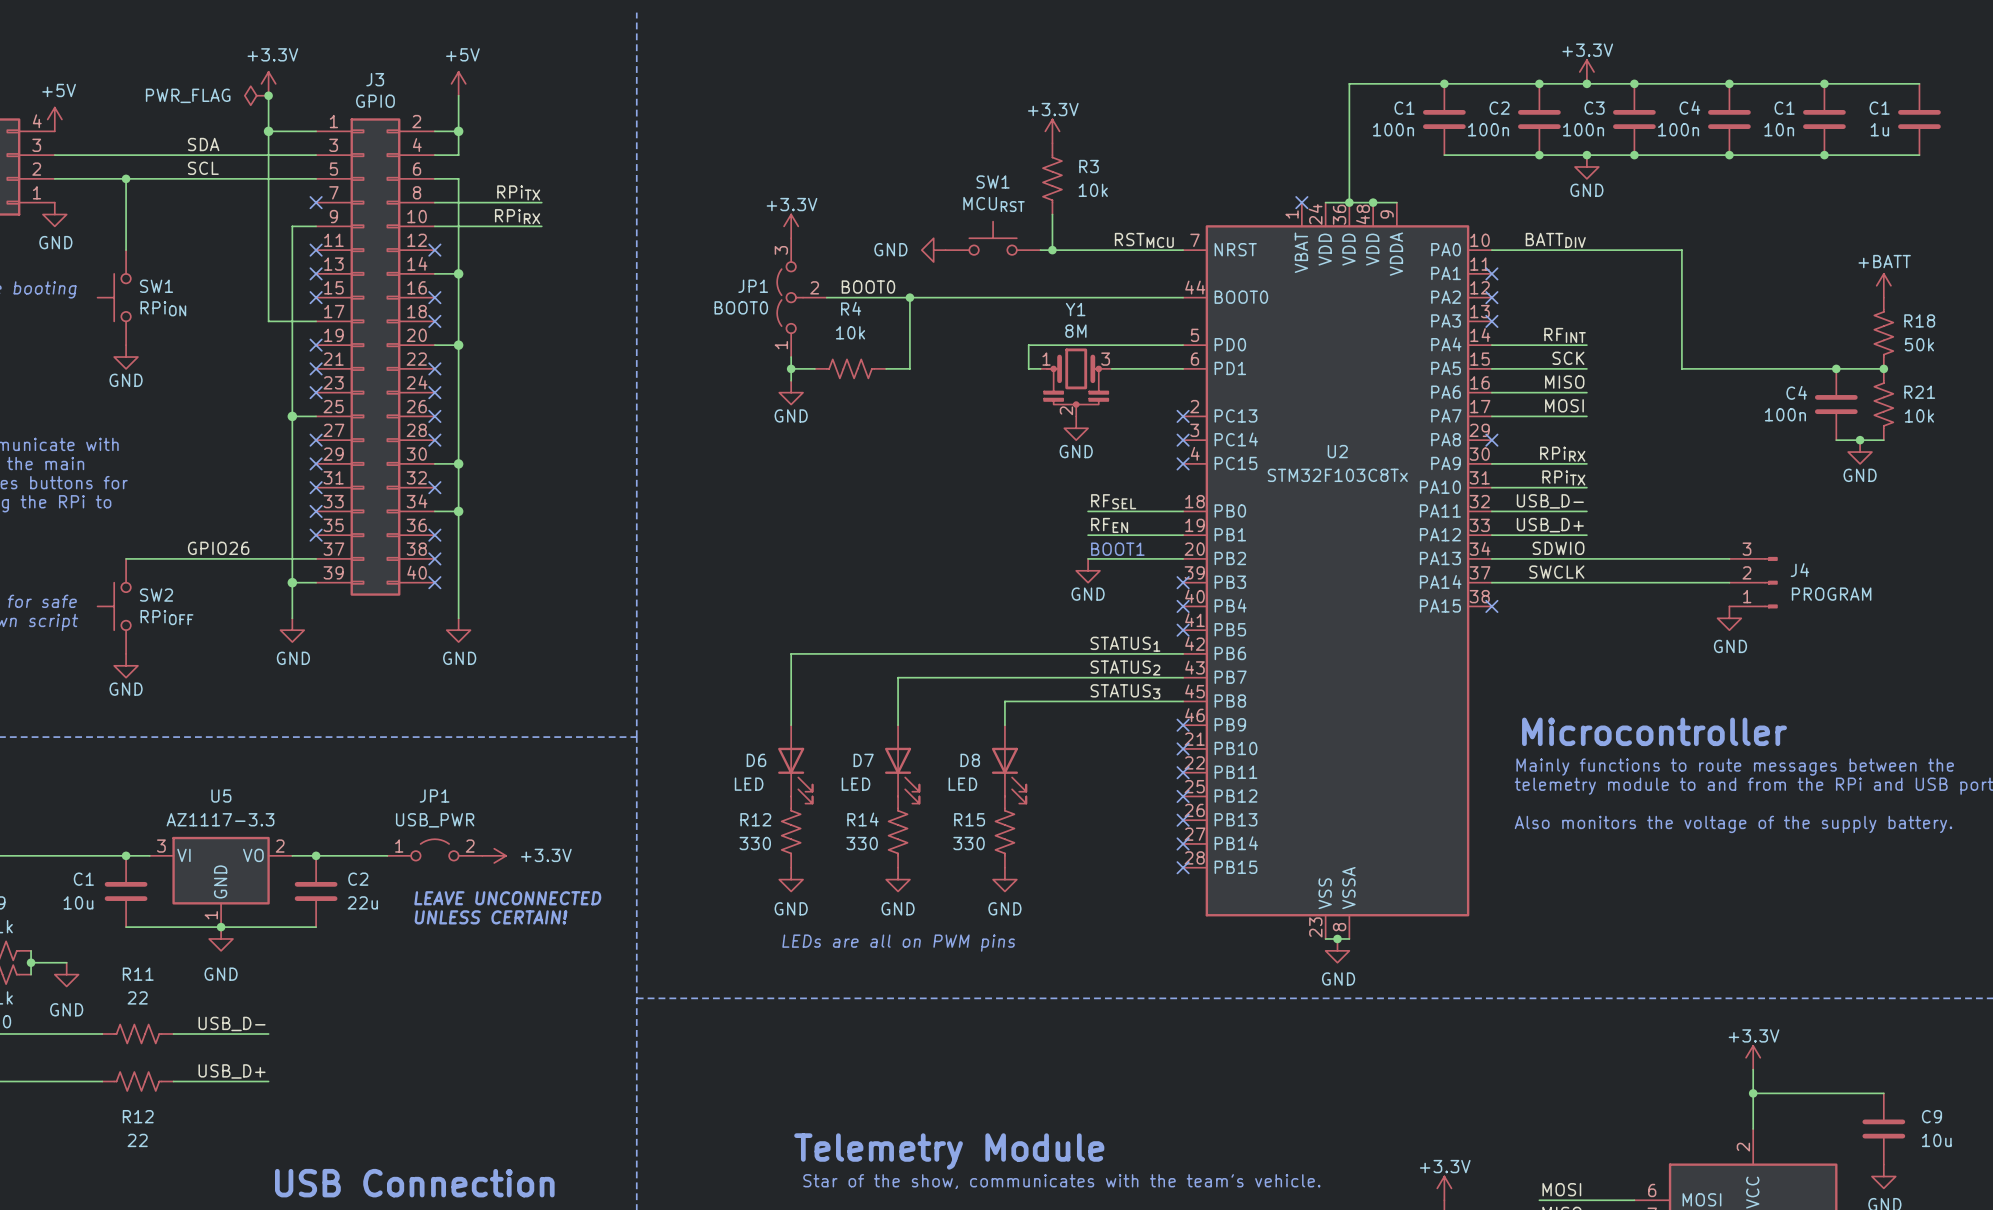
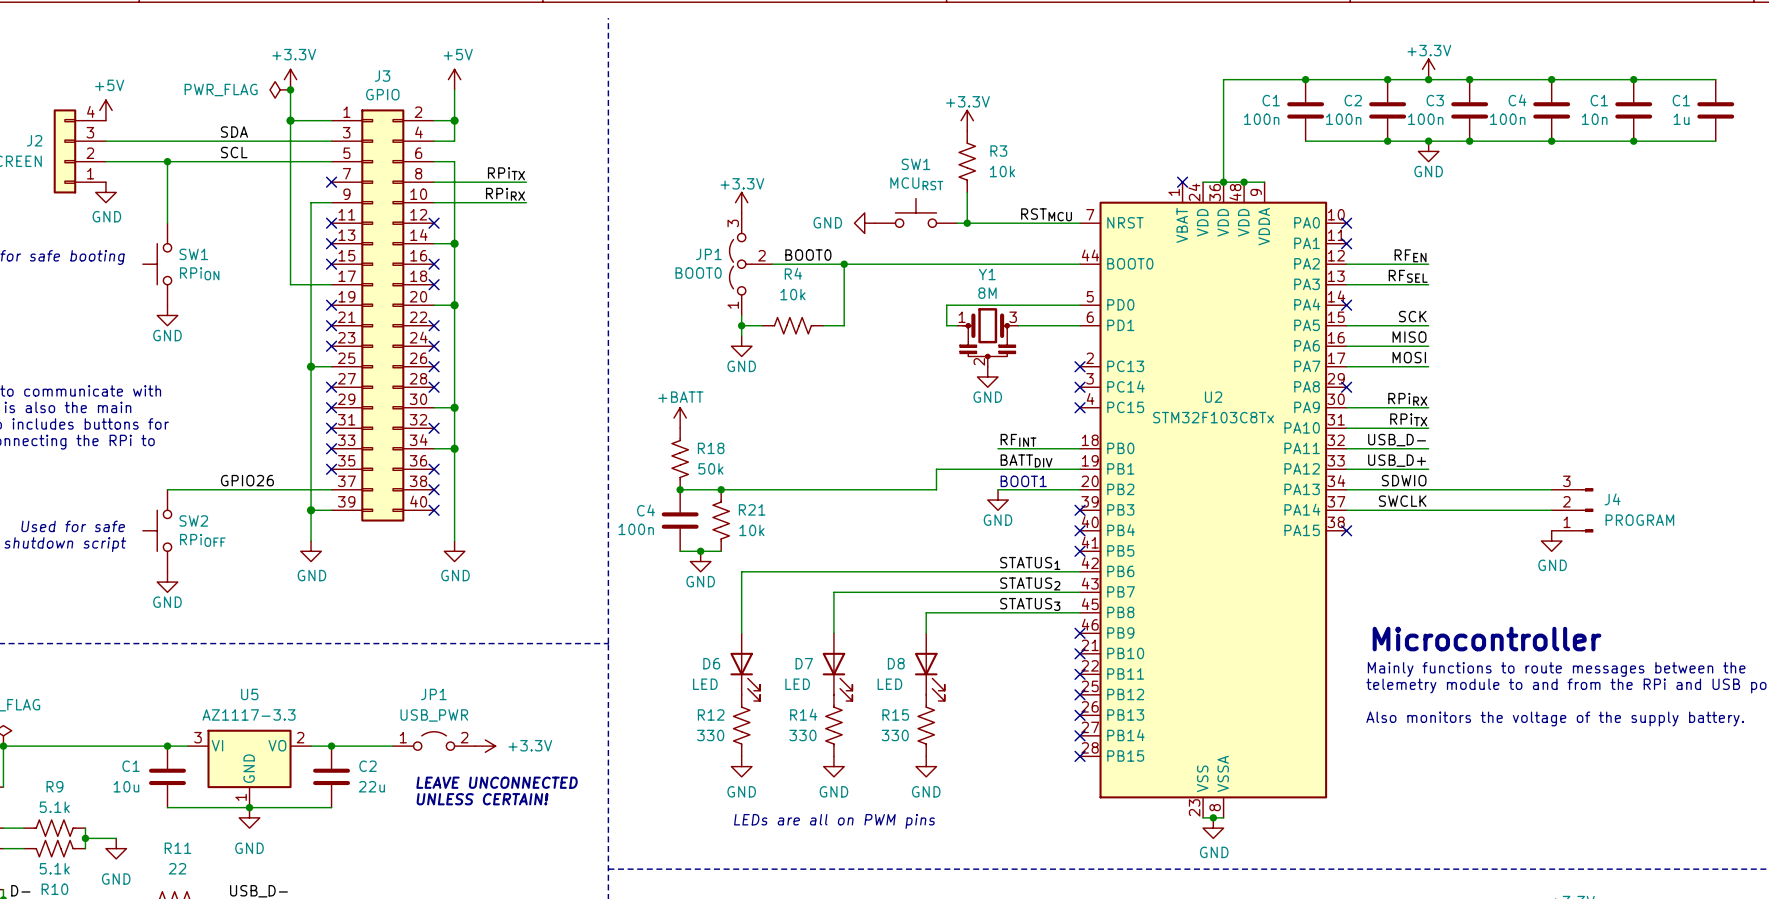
label: BATTDIV (1555, 240) -> none
wire: (1491, 250) (1681, 250) (1681, 368) (1883, 368) -> none
no-connect mark: none -> (1346, 223)
power symbol: +BATT (1883, 285) -> none
label: none -> RFEN (1410, 255)
wire: none -> (1346, 264) (1428, 264)
no-connect mark: (1491, 297) -> none
no-connect mark: (1491, 321) -> none
R18 position: (1883, 333) -> (680, 459)
label: RFINT (1565, 335) -> RFSEL (1408, 276)
wire: (1491, 345) (1586, 345) -> (1346, 284) (1428, 284)
no-connect mark: none -> (1346, 305)
junction: (1836, 368) -> none
junction: (1883, 368) -> none
C4: 100n (1836, 404) -> none
R21 position: (1883, 404) -> (721, 520)
wire: (1836, 440) (1883, 440) -> none
junction: (1860, 440) -> none
power symbol: GND (1860, 452) -> none
power symbol: none -> +BATT (680, 418)
label: RFSEL (1113, 501) -> RFINT (1018, 440)
label: RFEN (1109, 525) -> BATTDIV (1026, 460)
wire: none -> (998, 469) (936, 469) (936, 489) (680, 489)
junction: none -> (680, 489)
junction: none -> (721, 489)
C4: none -> 100n (680, 520)
wire: none -> (680, 551) (721, 551)
junction: none -> (700, 551)
power symbol: none -> GND (700, 561)

